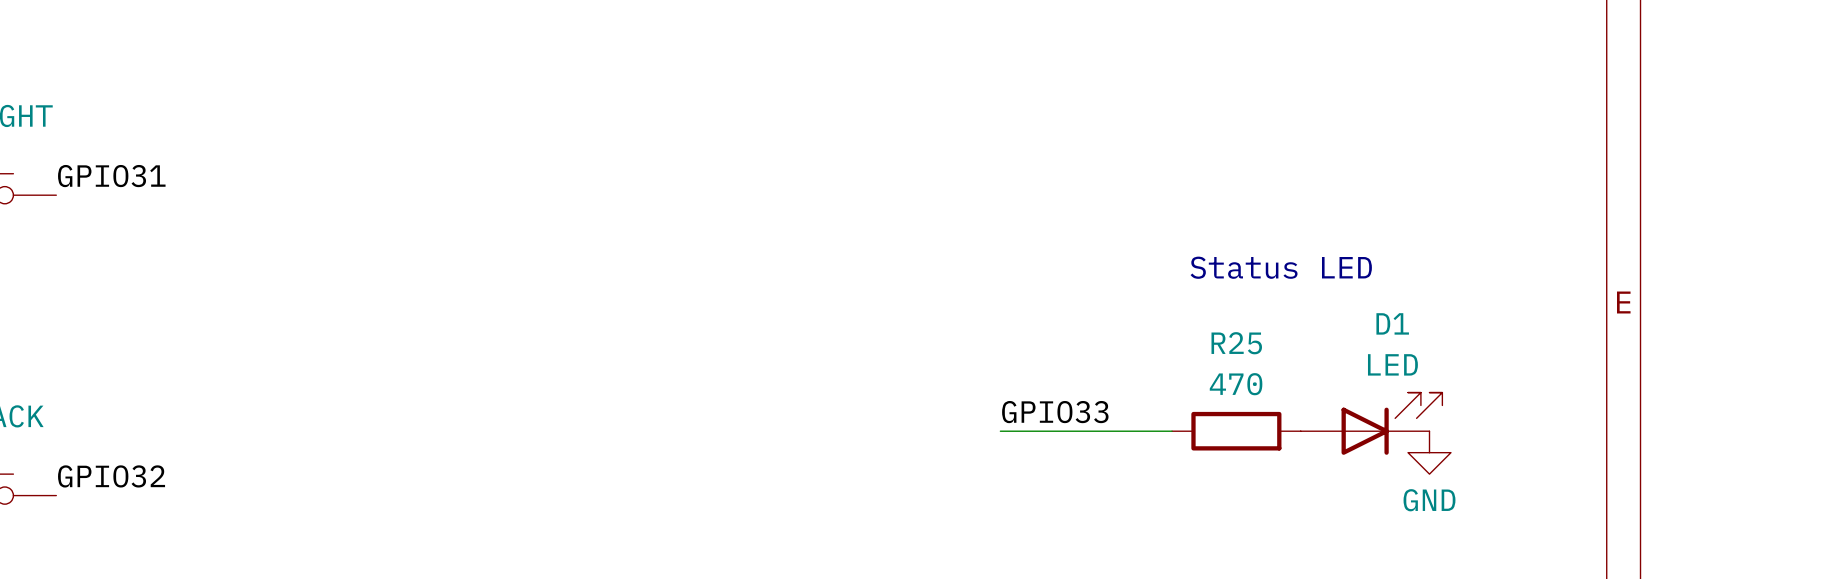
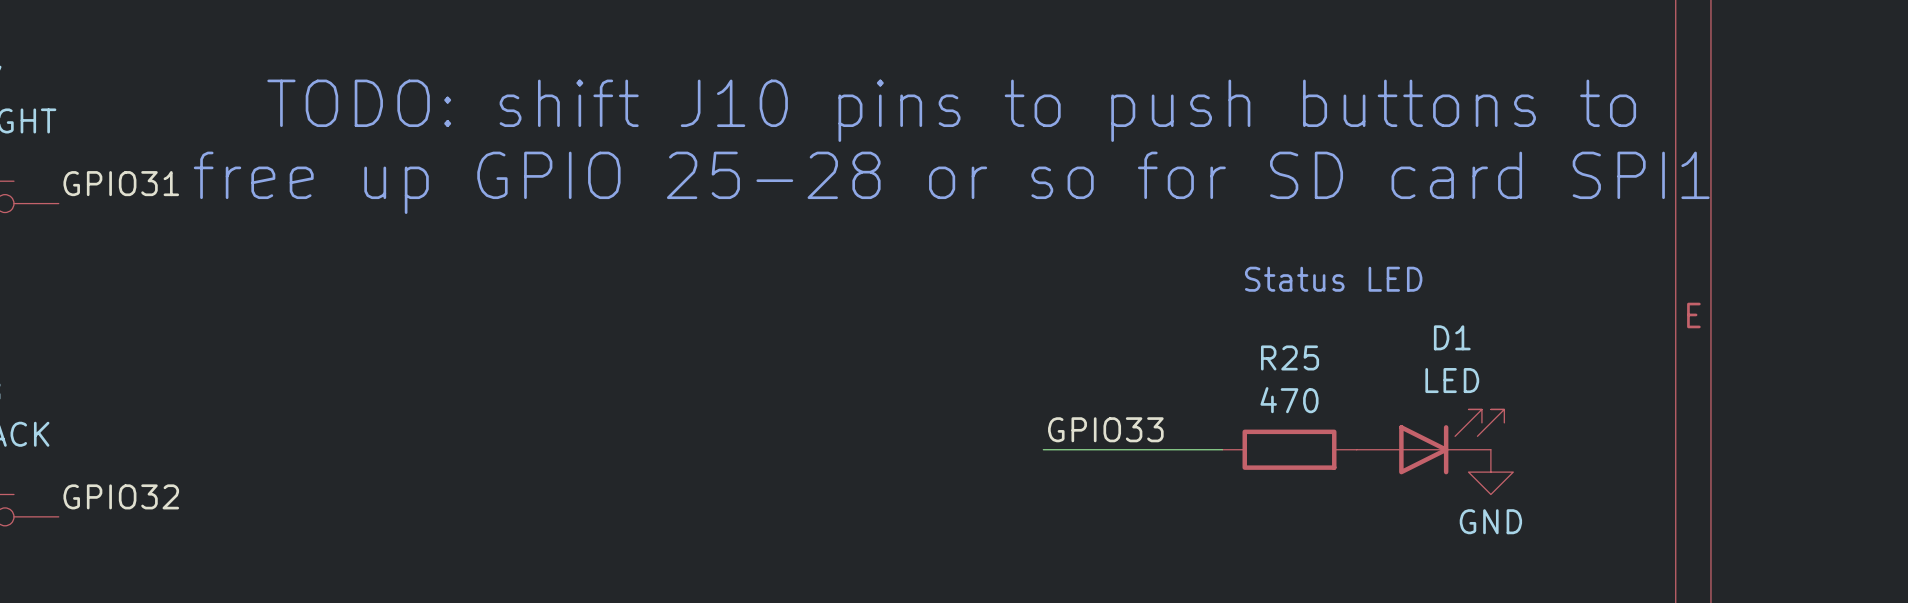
text: none -> TODO: shift J10 pins to push buttons to (951, 110)
text: none -> free up GPIO 25-28 or so for SD card SPI1 (951, 182)

